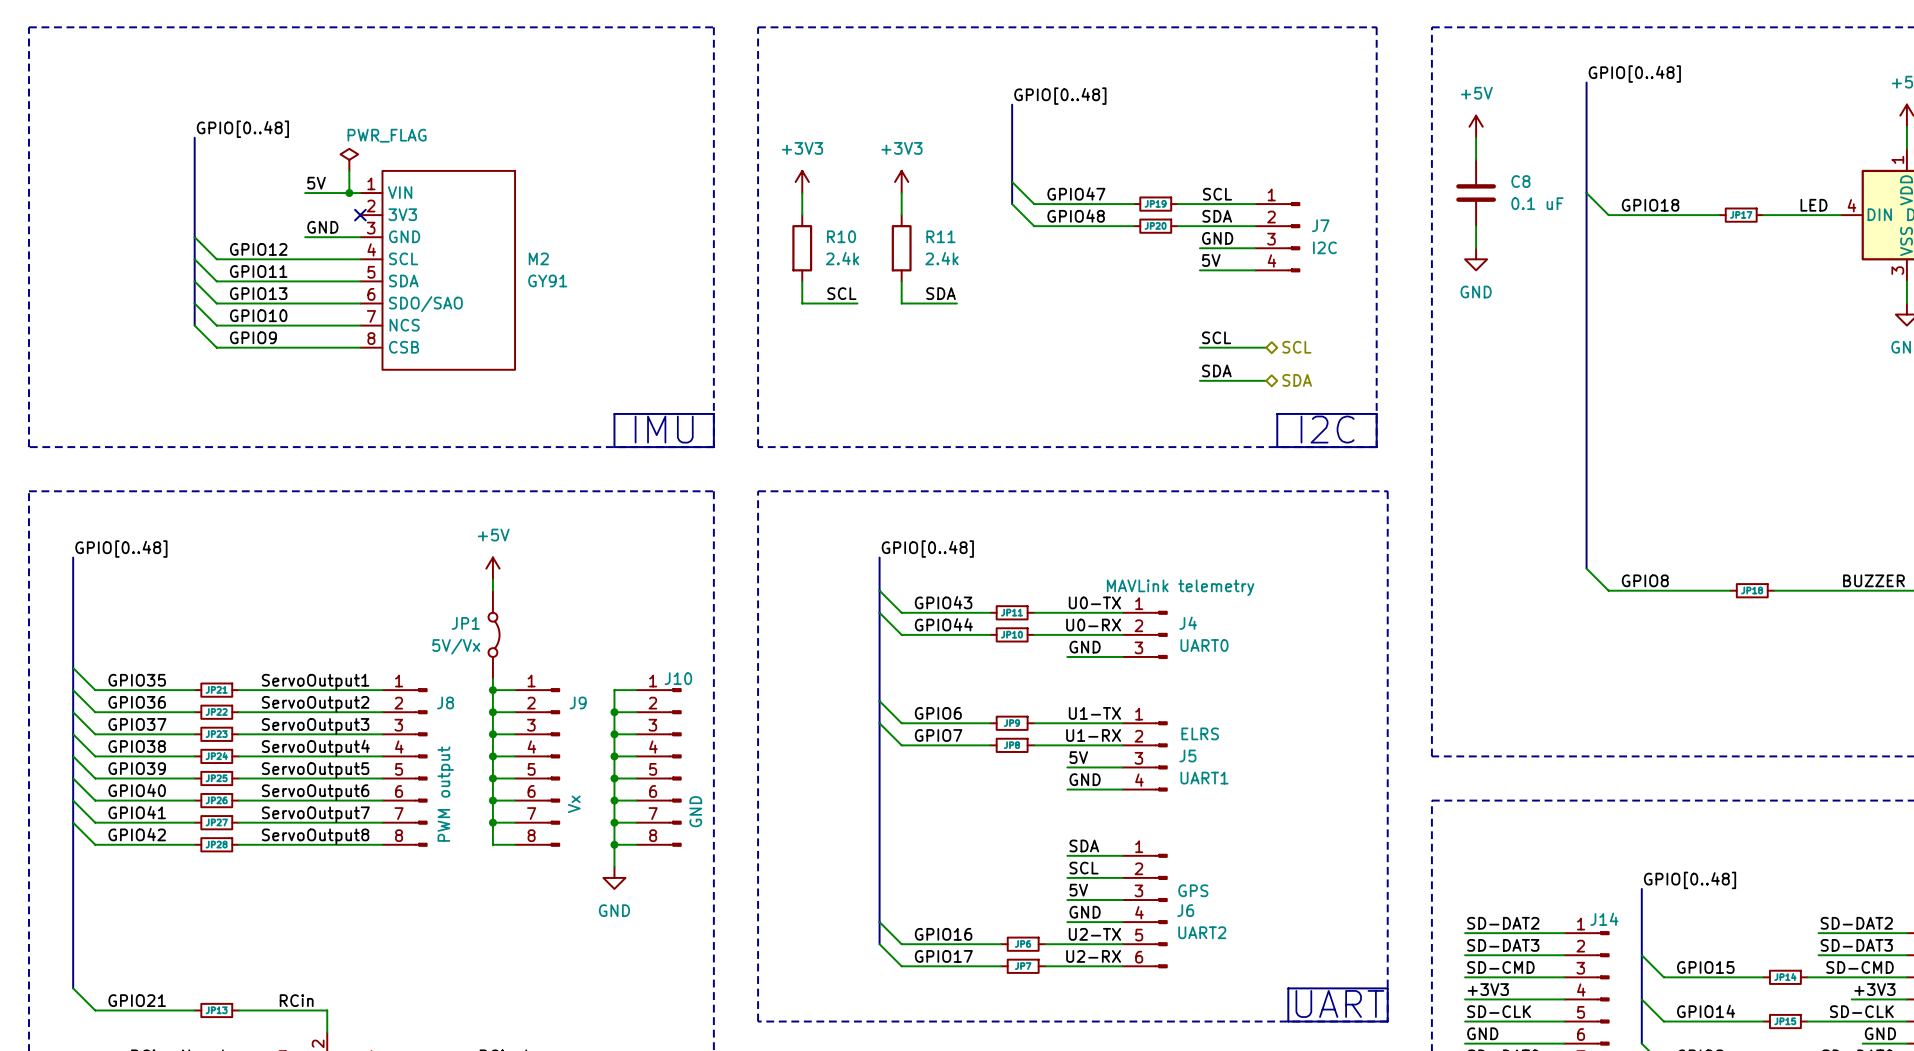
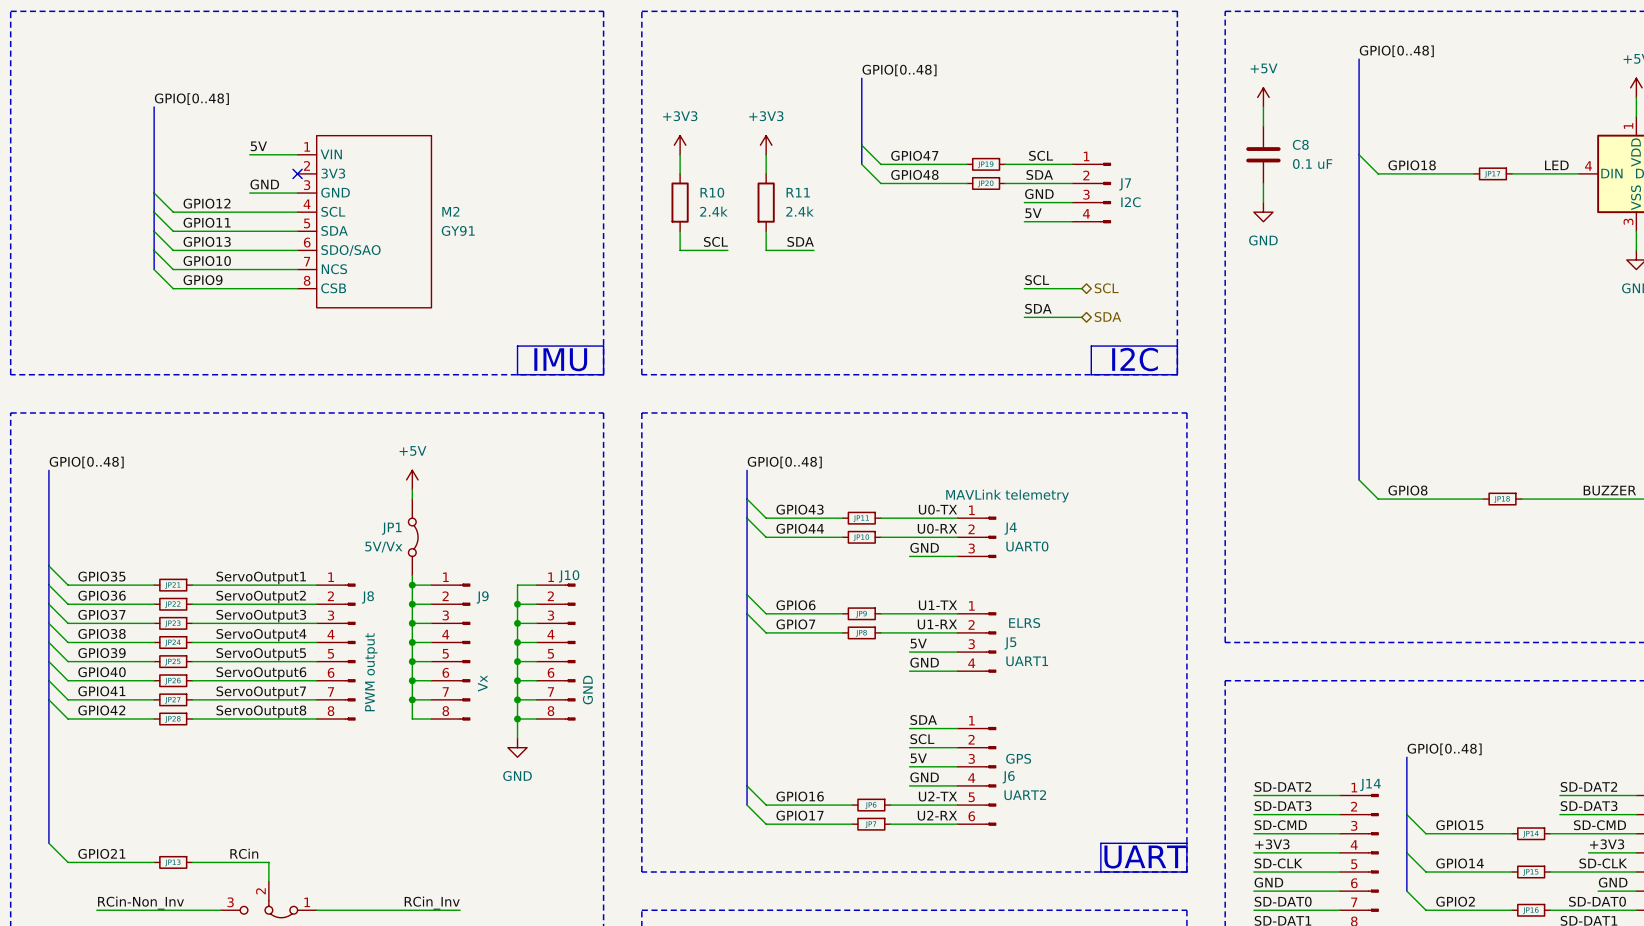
power symbol: PWR_FLAG (349, 159) -> none
wire: (349, 170) (349, 193) -> none
junction: (349, 193) -> none

